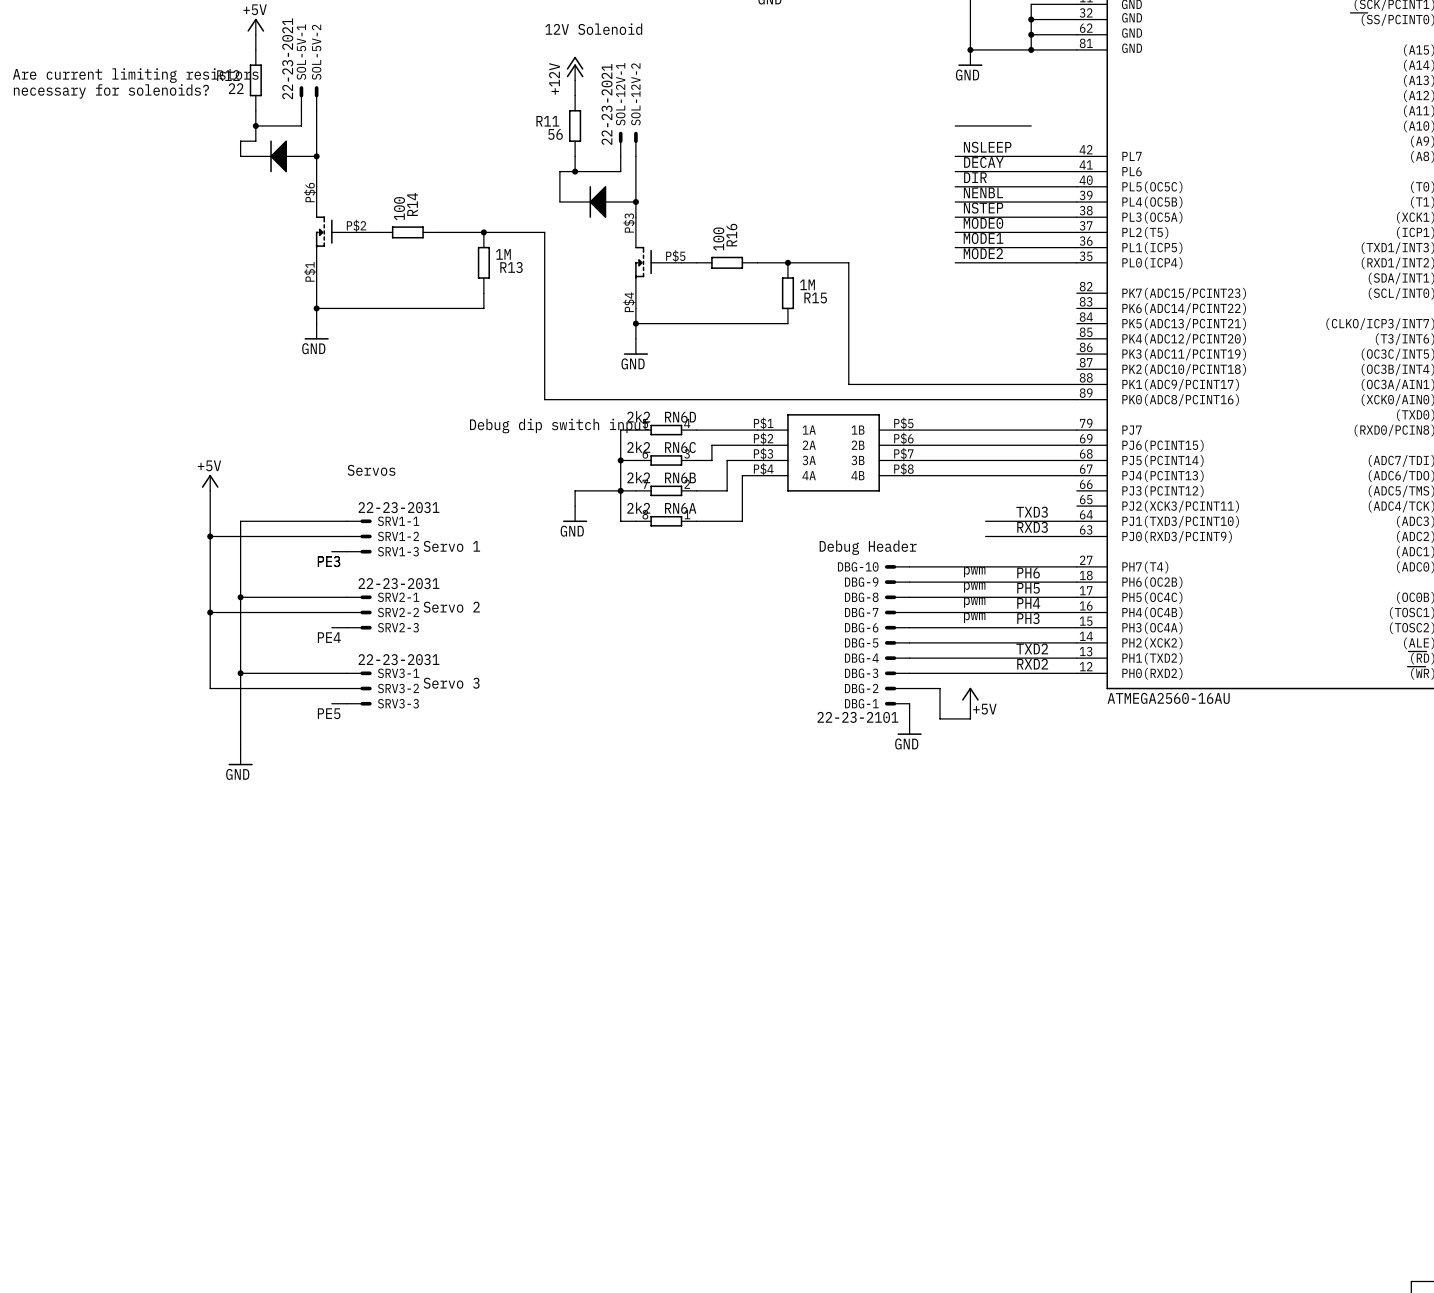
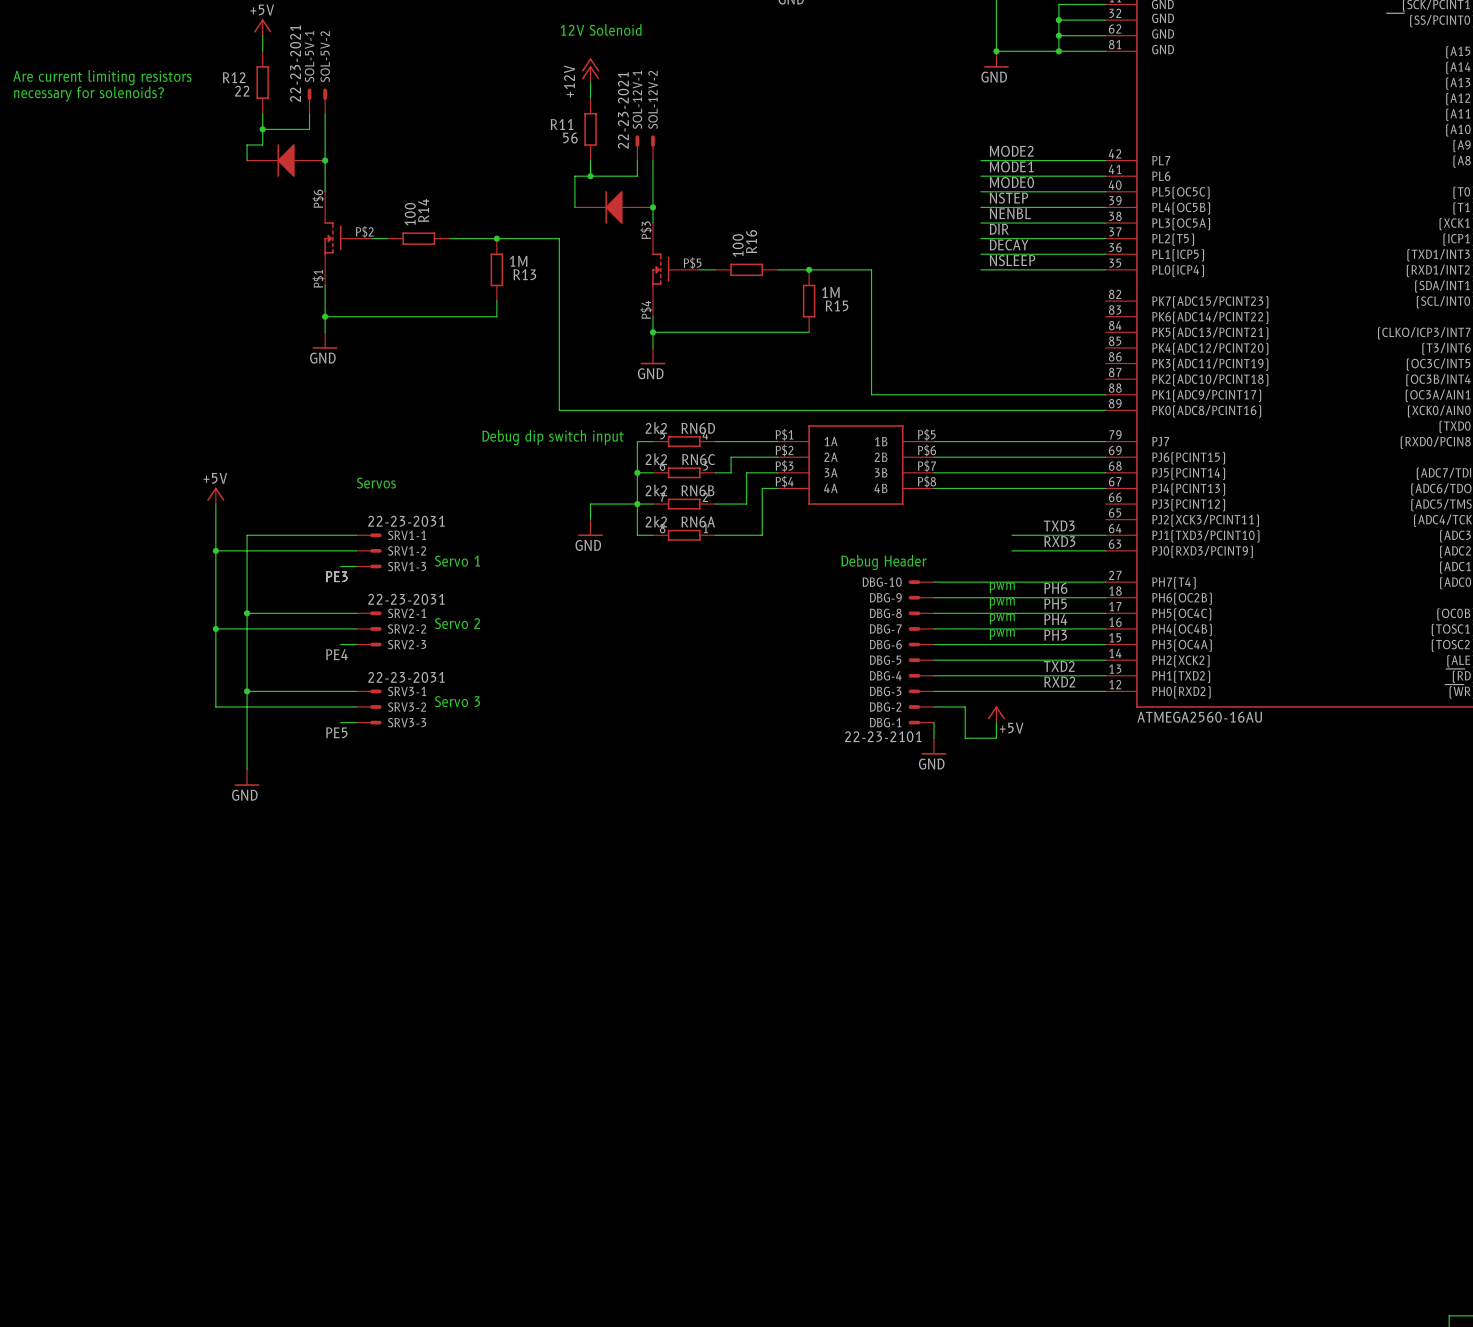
wire: (955, 125) (1031, 125) -> none
label: NSLEEP (987, 147) -> MODE2 (1011, 151)
label: DECAY (983, 162) -> MODE1 (1011, 166)
label: DIR (975, 177) -> MODE0 (1011, 182)
label: NENBL (983, 192) -> NSTEP (1008, 198)
label: NSTEP (983, 208) -> NENBL (1010, 213)
label: MODE0 (983, 223) -> DIR (999, 229)
label: MODE1 (983, 238) -> DECAY (1009, 244)
label: MODE2 (983, 253) -> NSLEEP (1012, 260)

